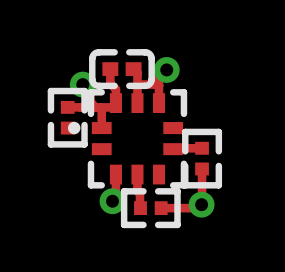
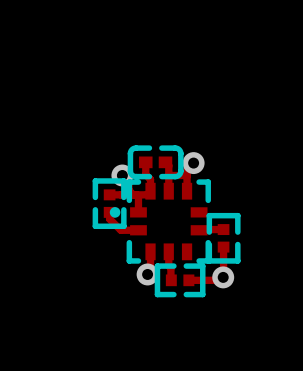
top track: none -> (109, 212) (109, 219) (120, 230) (138, 230)

